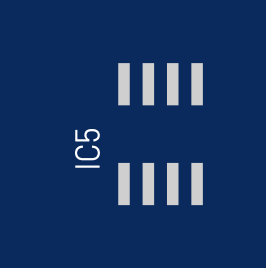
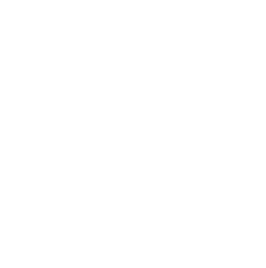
IC5: (160, 134) -> none

